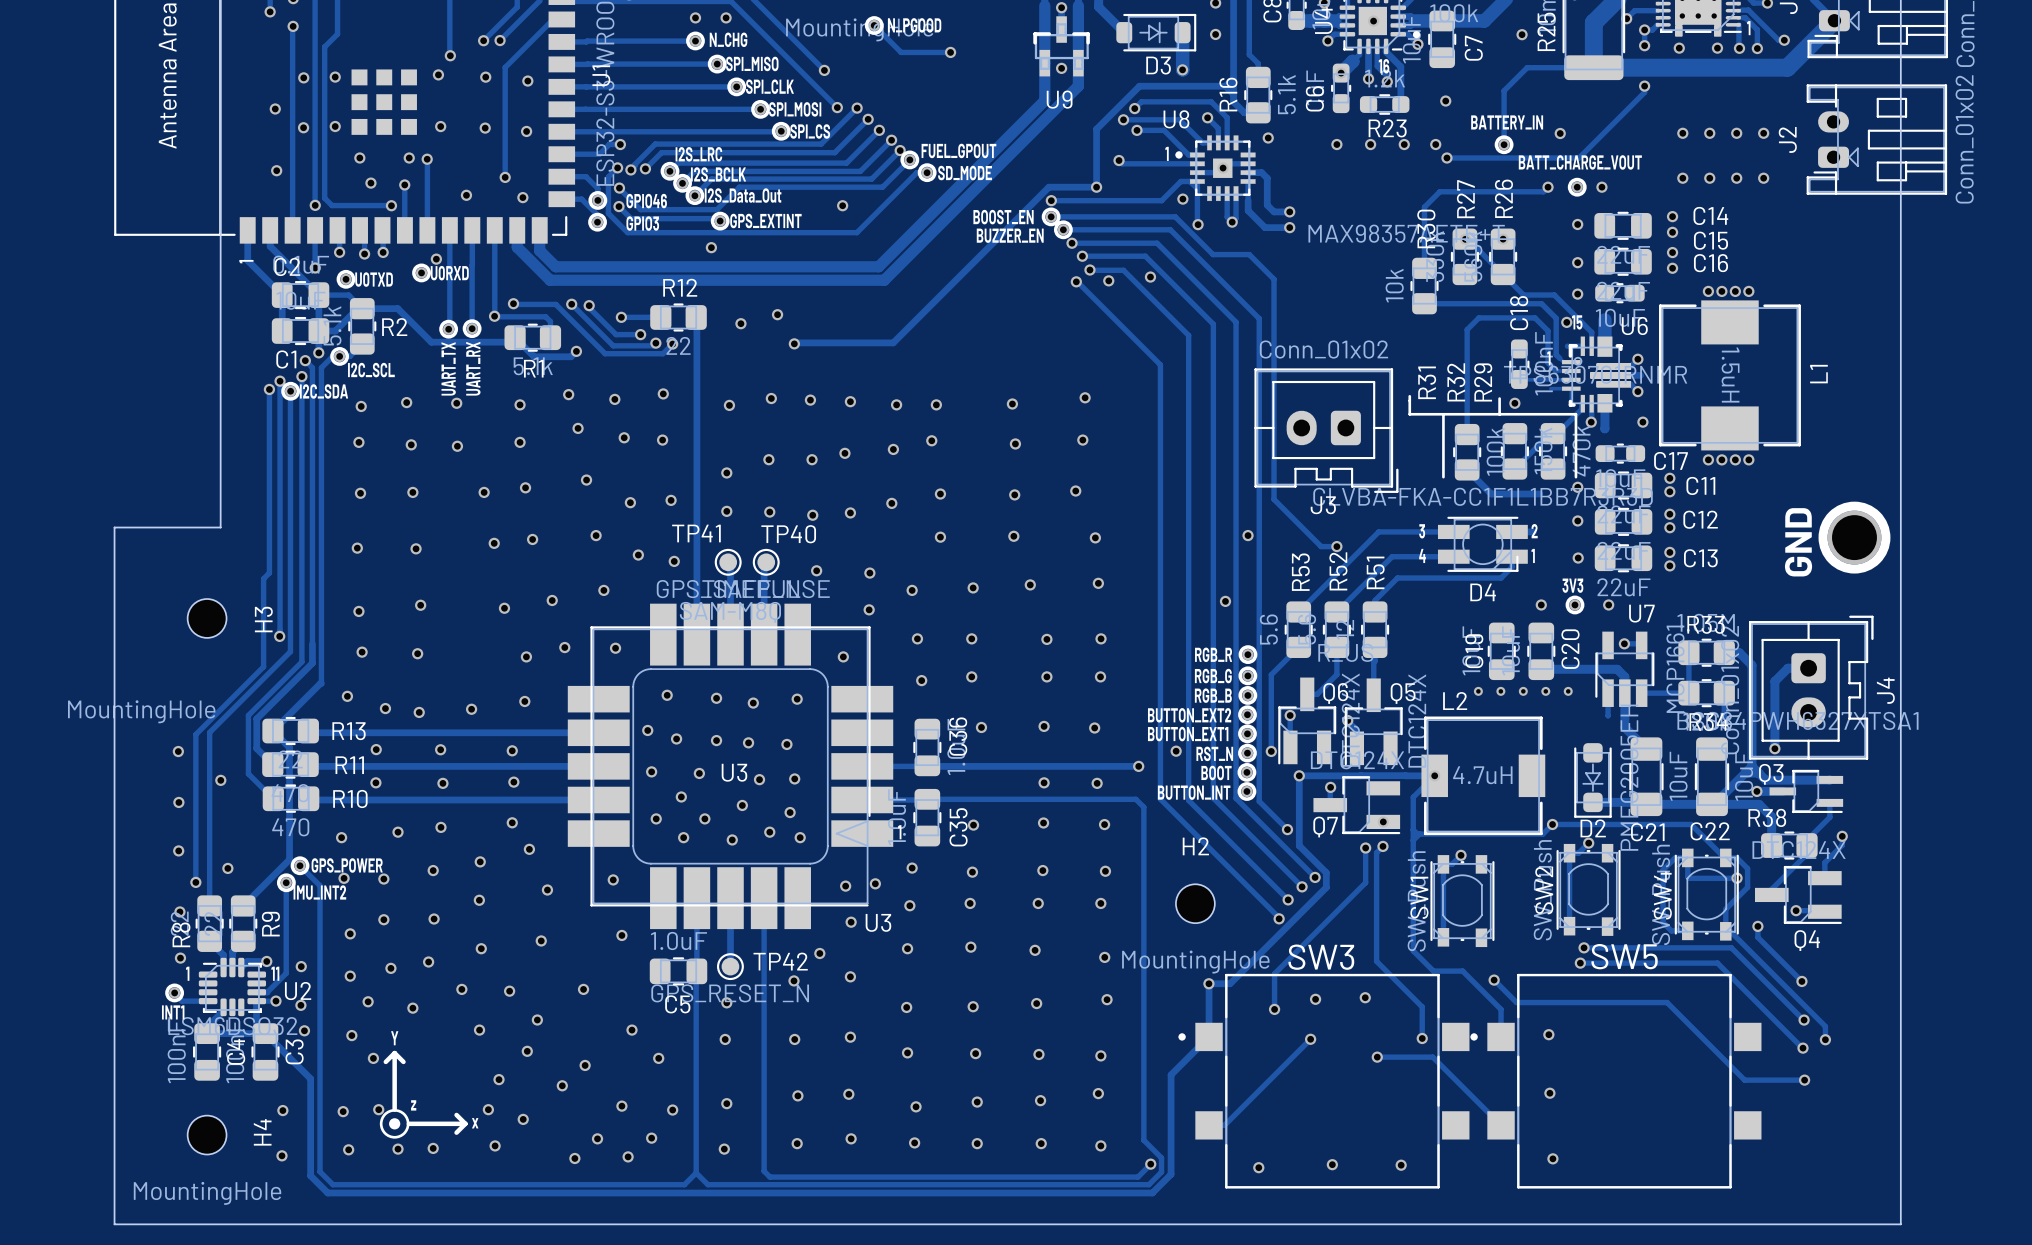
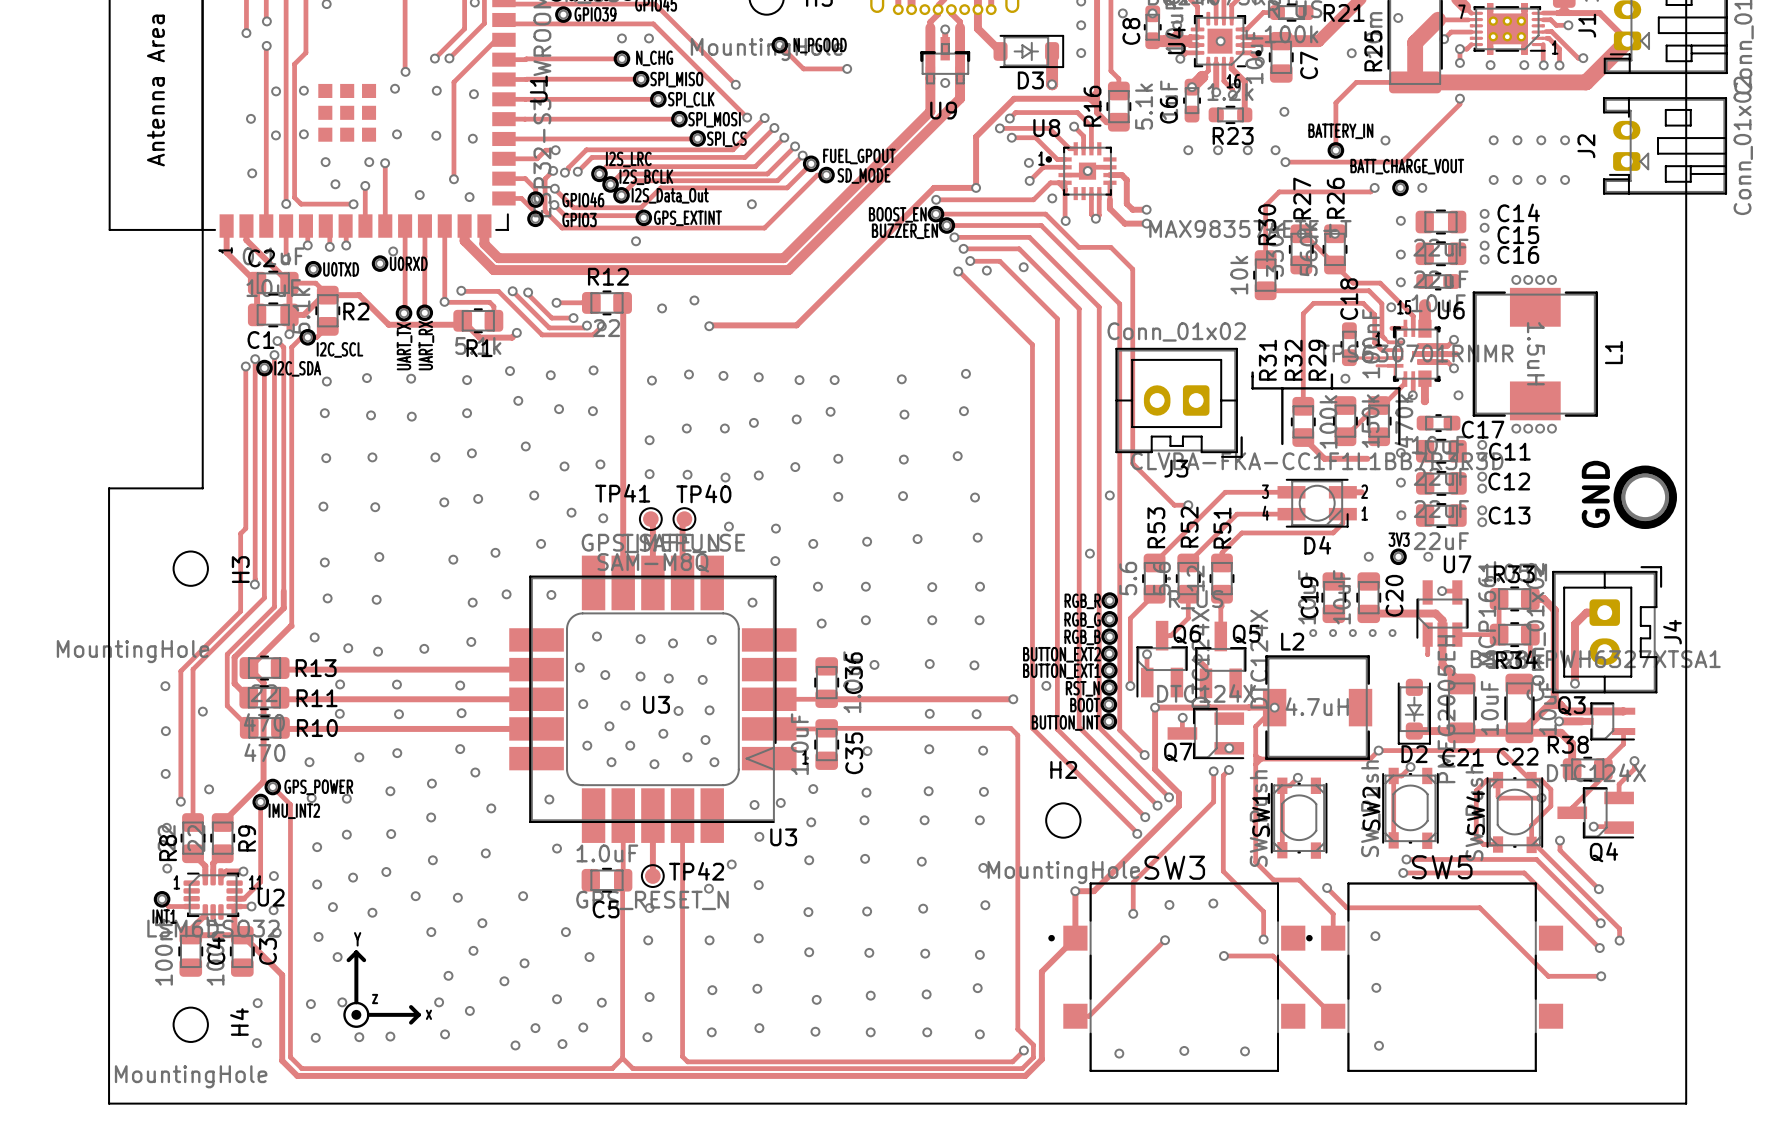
via: (1268, 137) -> none
via: none -> (1028, 162)
track: (1119, 160) (1122, 163) (1172, 163) -> (1029, 180) (1043, 167)
via: (1119, 160) -> none
via: none -> (1029, 180)

